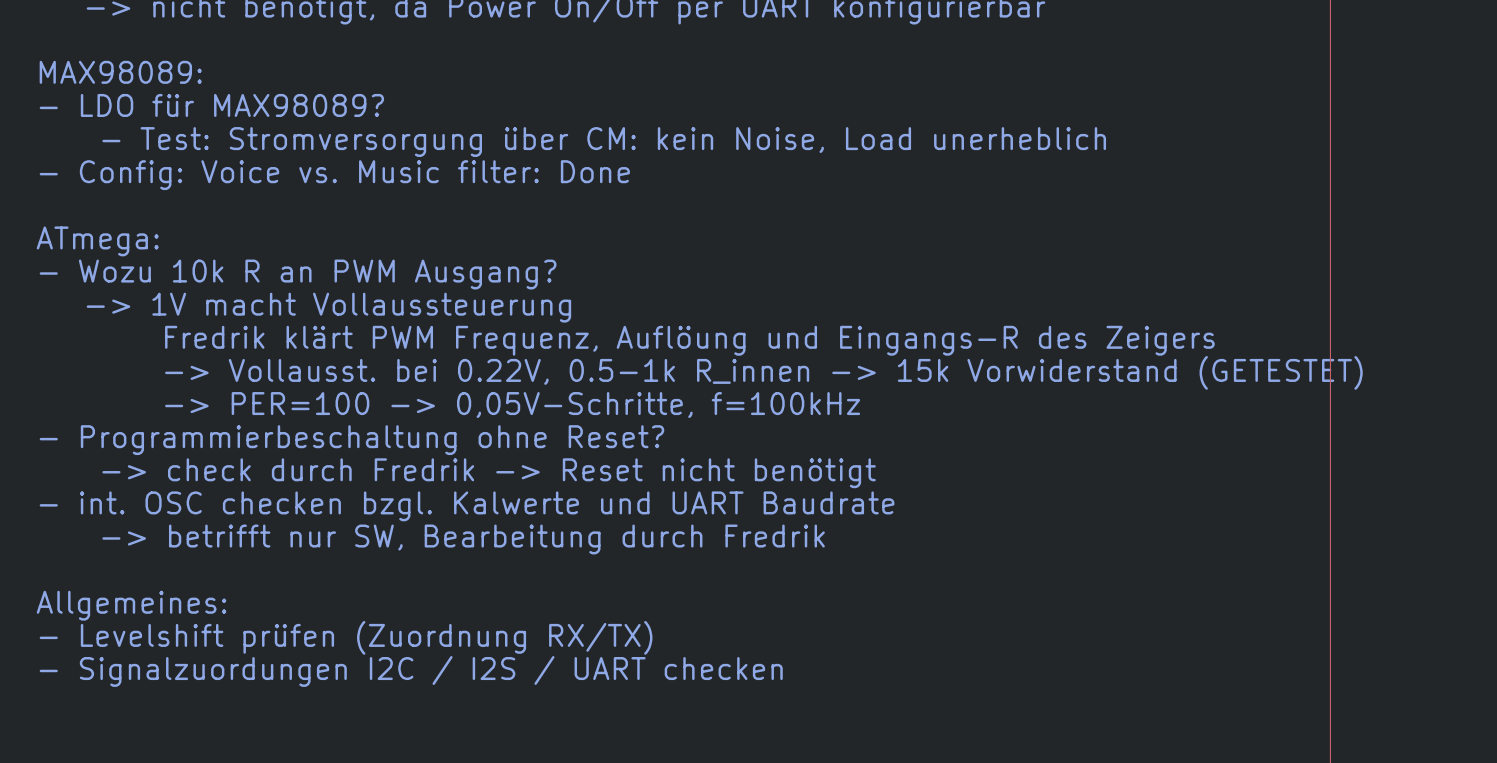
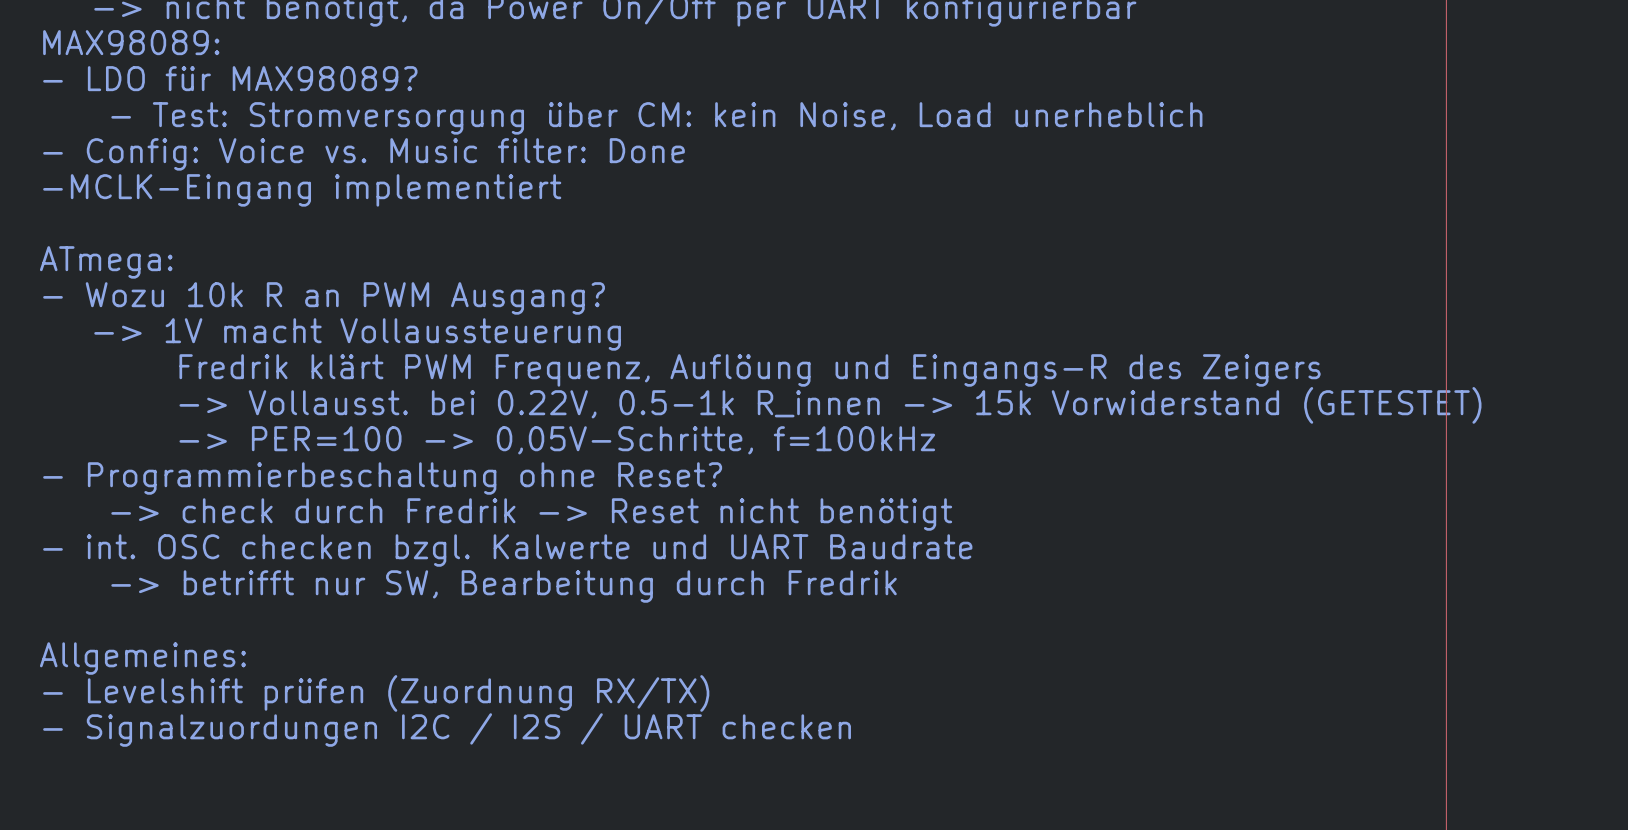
text: none -> MAX98089: (131, 42)
text: MAX98089: (120, 72) -> - LDO für MAX98089? (230, 78)
text: - LDO für MAX98089? (211, 105) -> - Test: Stromversorgung über CM: kein Noise, Load unerheblich (656, 118)
text: - Test: Stromversorgung über CM: kein Noise, Load unerheblich (604, 142) -> - Config: Voice vs. Music filter: Done (363, 154)
text: - Config: Voice vs. Music filter: Done (334, 175) -> -MCLK-Eingang implementiert (302, 190)

